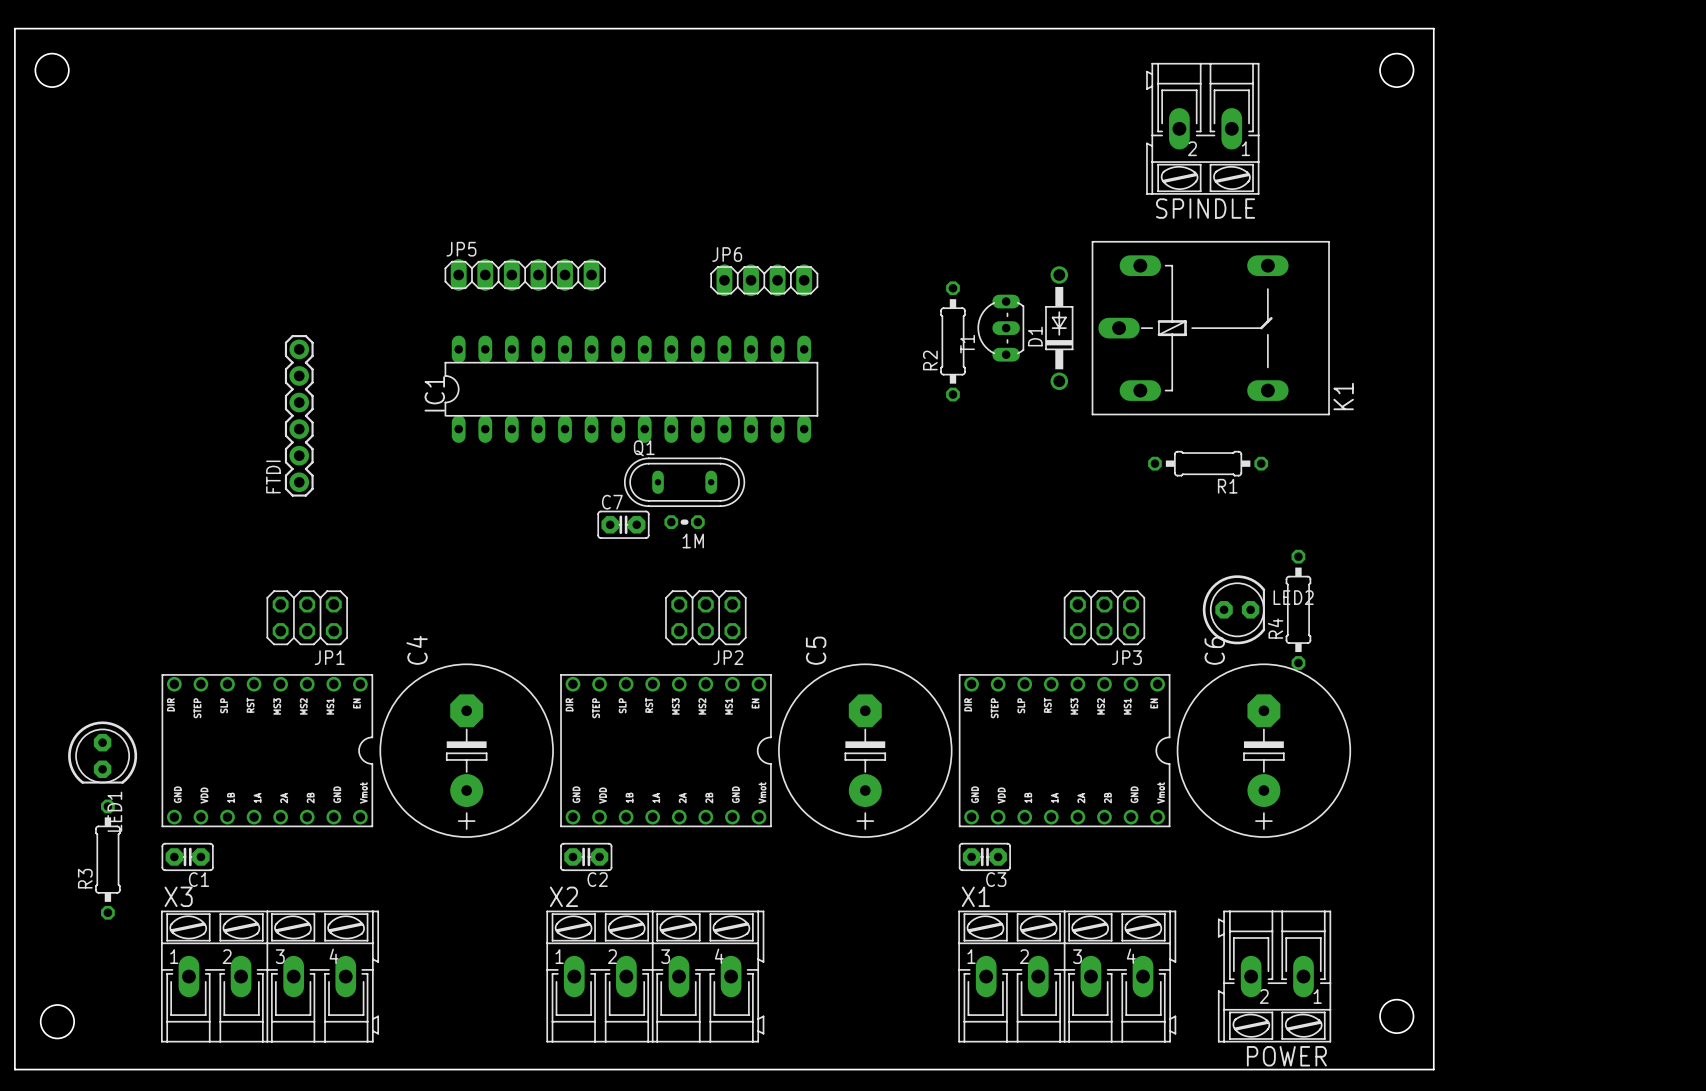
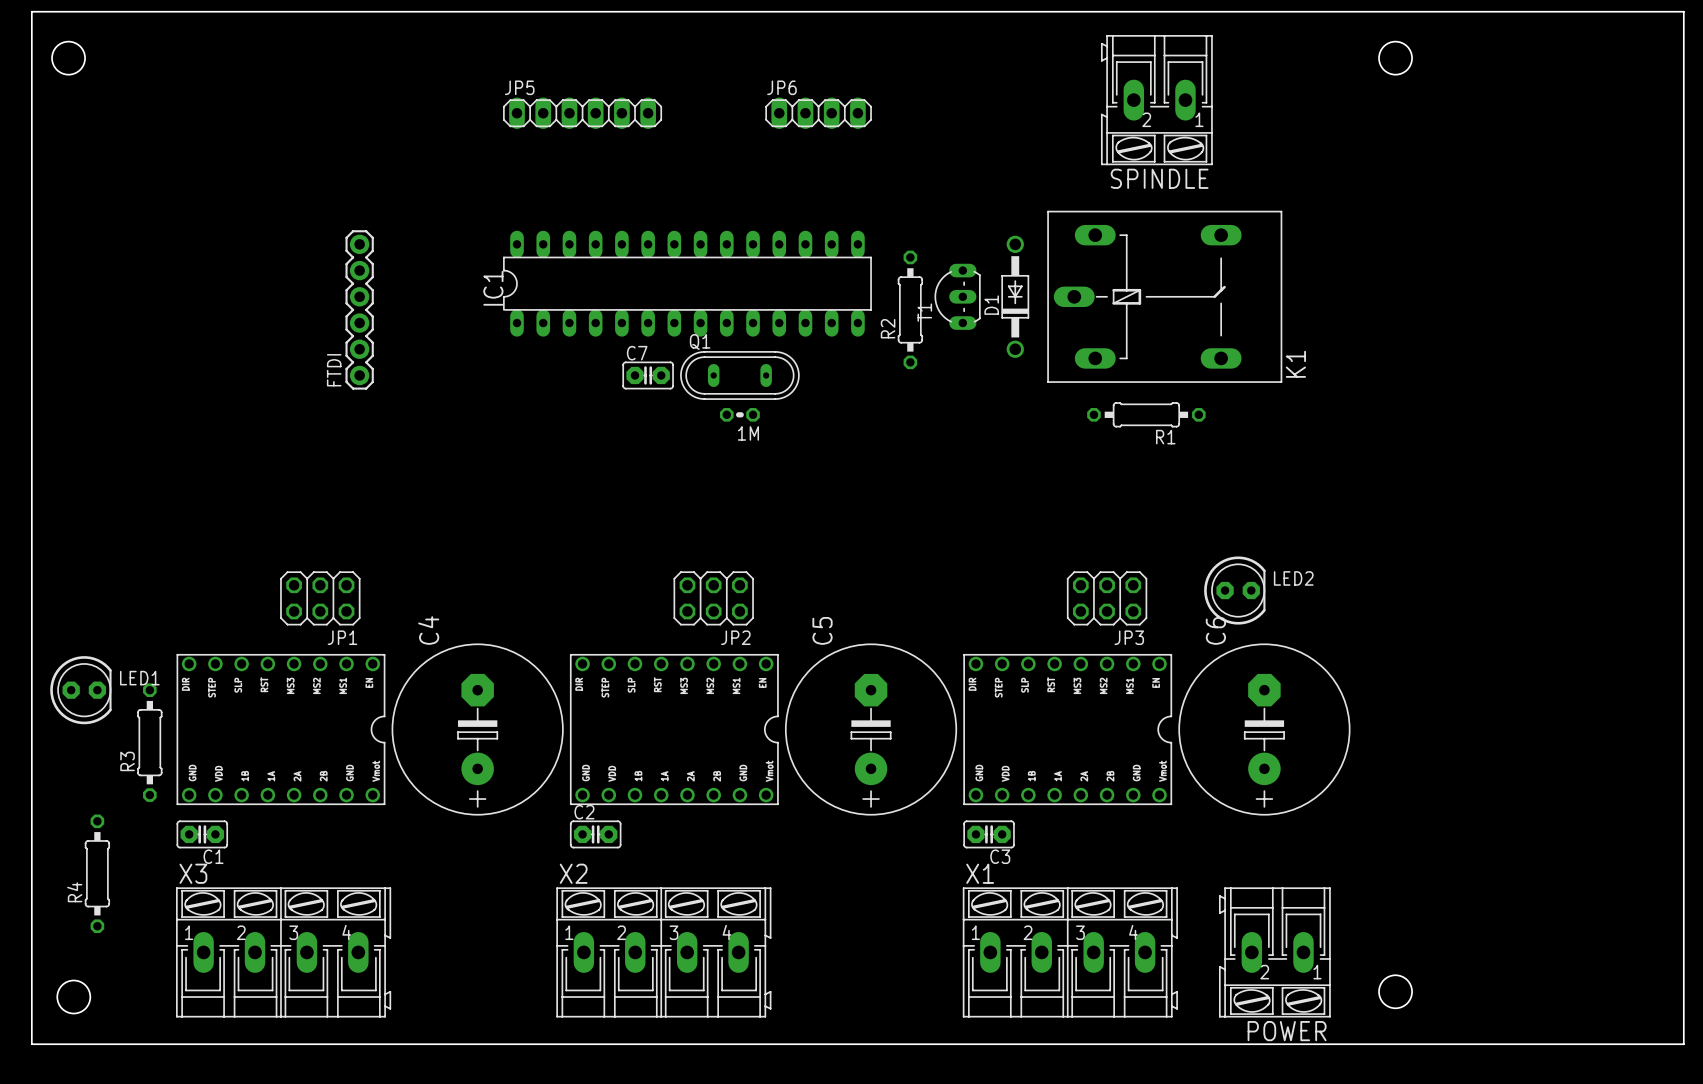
board edge: (14, 28) (1433, 28) (1433, 1069) -> (31, 16) (31, 11) (1683, 11) (1683, 1044) (1432, 1044)
SPINDLE position: (1202, 128) -> (1156, 100)
JP5 position: (525, 274) -> (582, 113)
JP6 position: (764, 280) -> (818, 113)
T1 position: (1000, 328) -> (957, 296)
D1 position: (1059, 328) -> (1015, 296)
K1 position: (1210, 328) -> (1164, 296)
R2 position: (952, 341) -> (910, 309)
IC1 position: (631, 389) -> (687, 283)
FTDI position: (299, 415) -> (359, 309)
R1 position: (1208, 463) -> (1146, 414)
Q1 position: (684, 482) -> (739, 375)
1M position: (684, 522) -> (739, 414)
C7 position: (623, 524) -> (648, 375)
R4 position: (1298, 609) -> (97, 873)
LED1 rotation: 0° (102, 752) -> 90° counterclockwise (81, 690)
LED1 position: (102, 752) -> (81, 690)
R3 position: (107, 859) -> (149, 742)
C2 name position: C2 (597, 879) -> C2 (584, 812)

